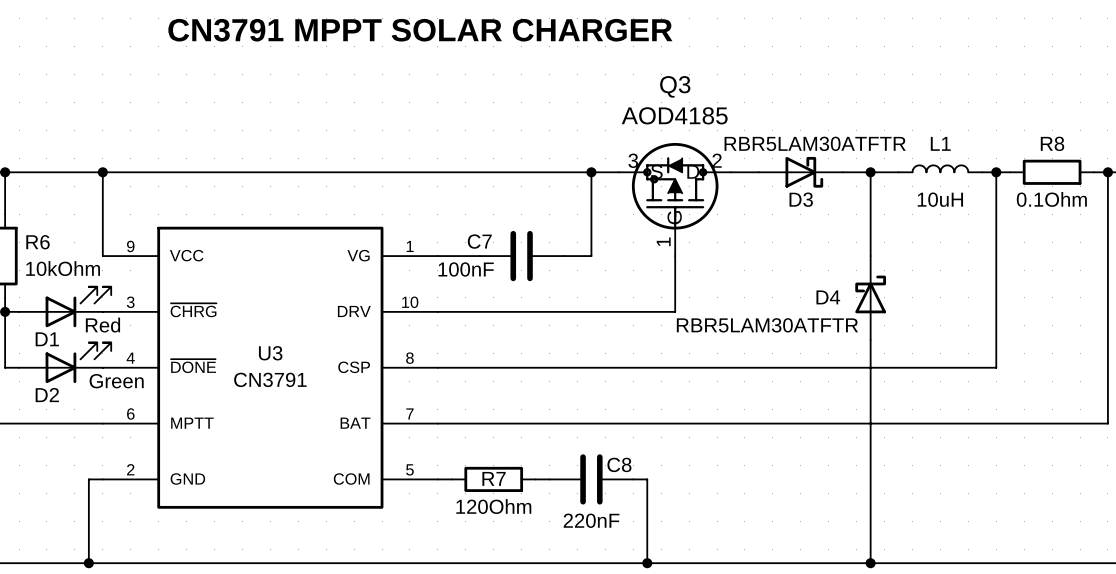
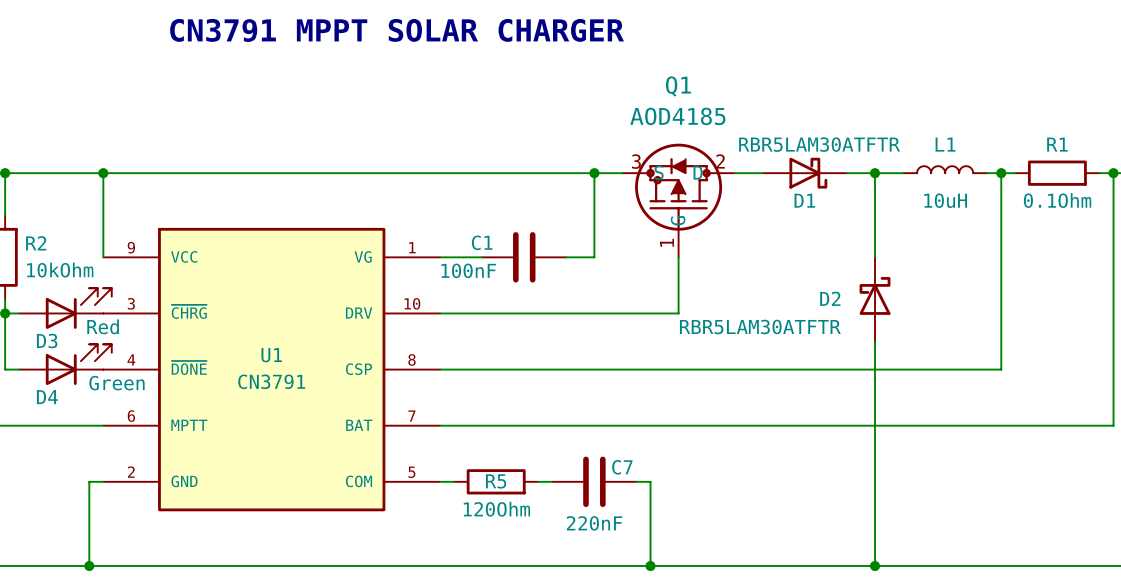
Q3 name: Q3 (675, 86) -> Q1 (678, 86)
R8 name: R8 (1052, 143) -> R1 (1057, 144)
D3 name: D3 (801, 199) -> D1 (804, 200)
C7 name: C7 (479, 241) -> C1 (482, 242)
R6 name: R6 (38, 242) -> R2 (36, 243)
D4 name: D4 (828, 297) -> D2 (830, 298)
D1 name: D1 (47, 339) -> D3 (47, 341)
U3 name: U3 (270, 353) -> U1 (271, 355)
D2 name: D2 (47, 395) -> D4 (47, 397)
C8 name: C8 (619, 464) -> C7 (622, 467)
R7 name: R7 (494, 478) -> R5 (496, 481)

